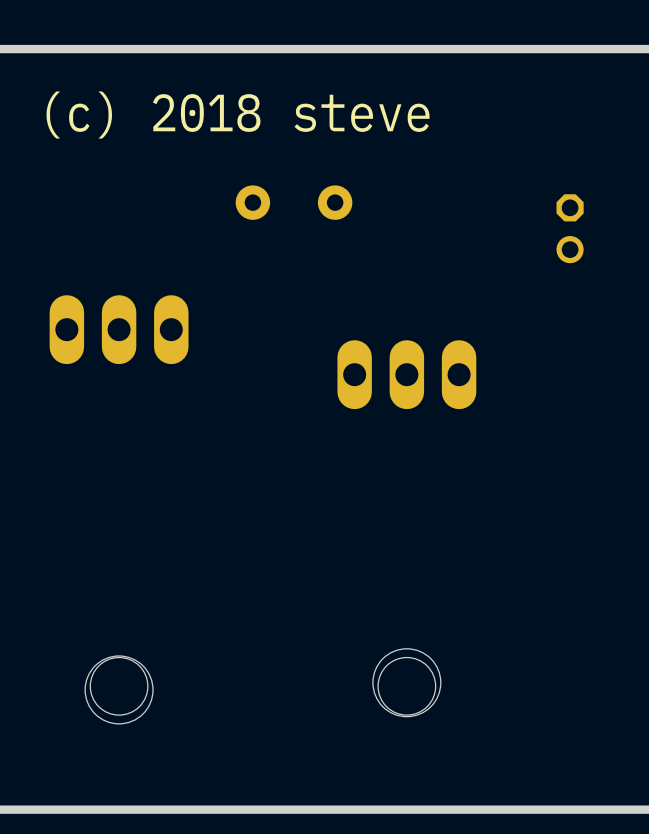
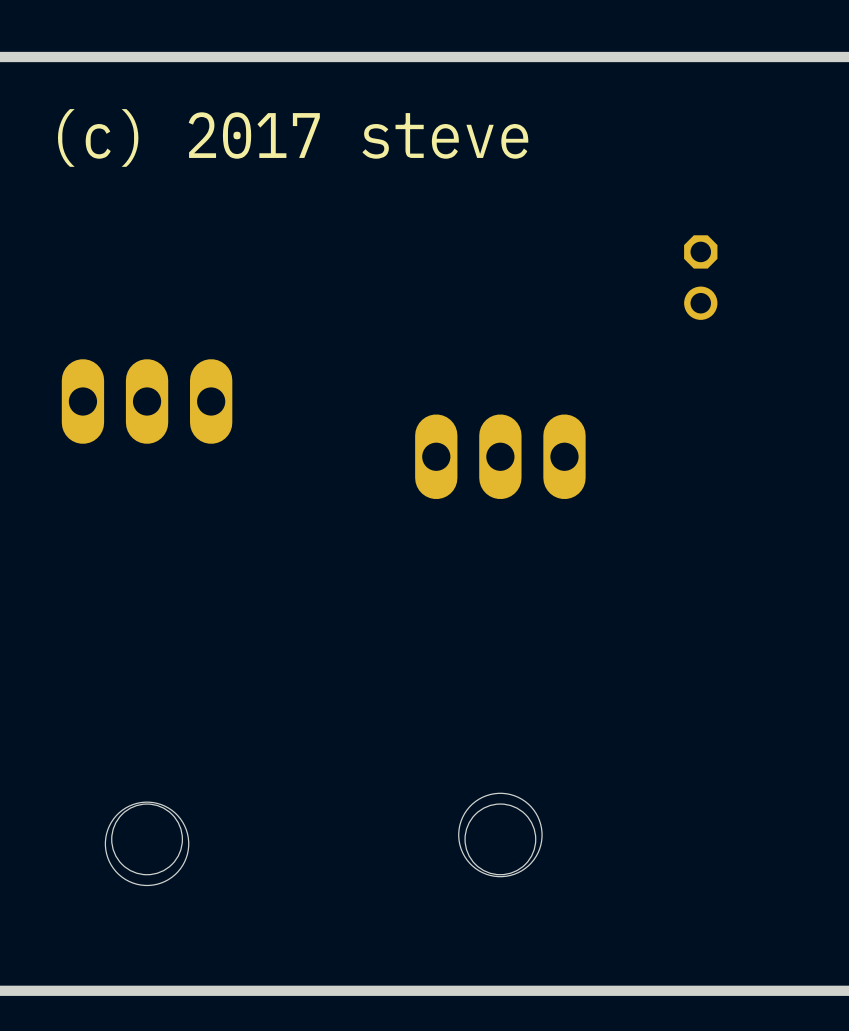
text: (c) 2018 steve (238, 115) -> (c) 2017 steve (293, 137)
part: (294, 202) -> none

